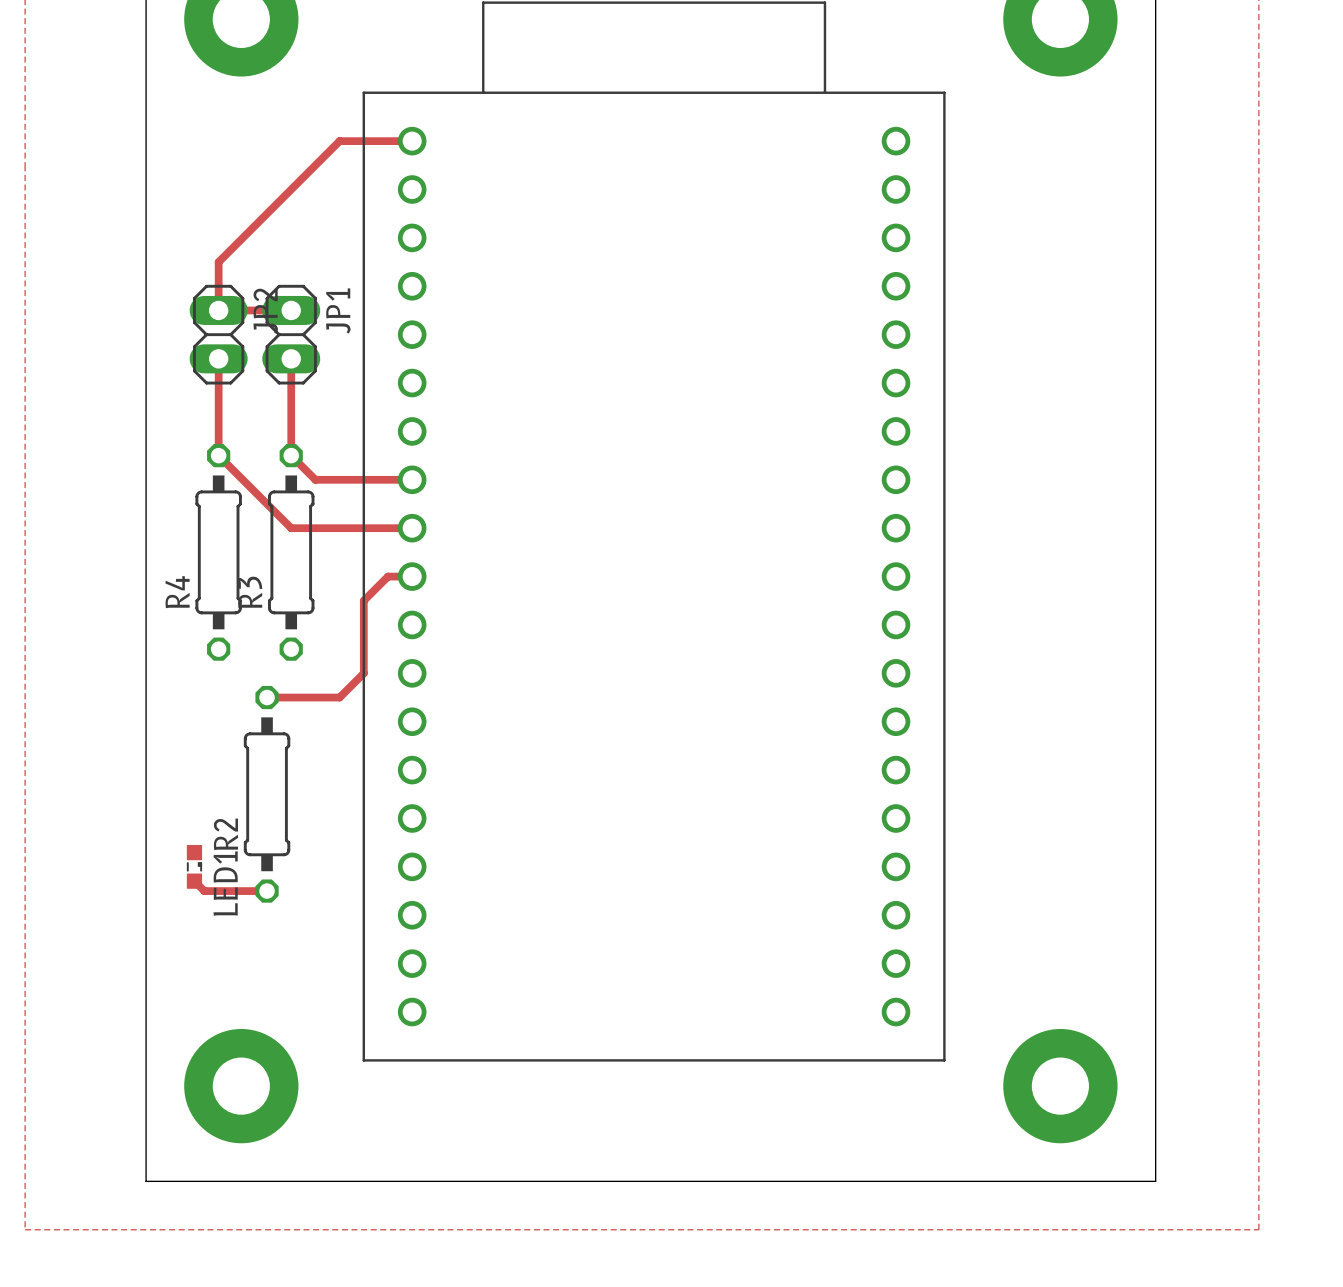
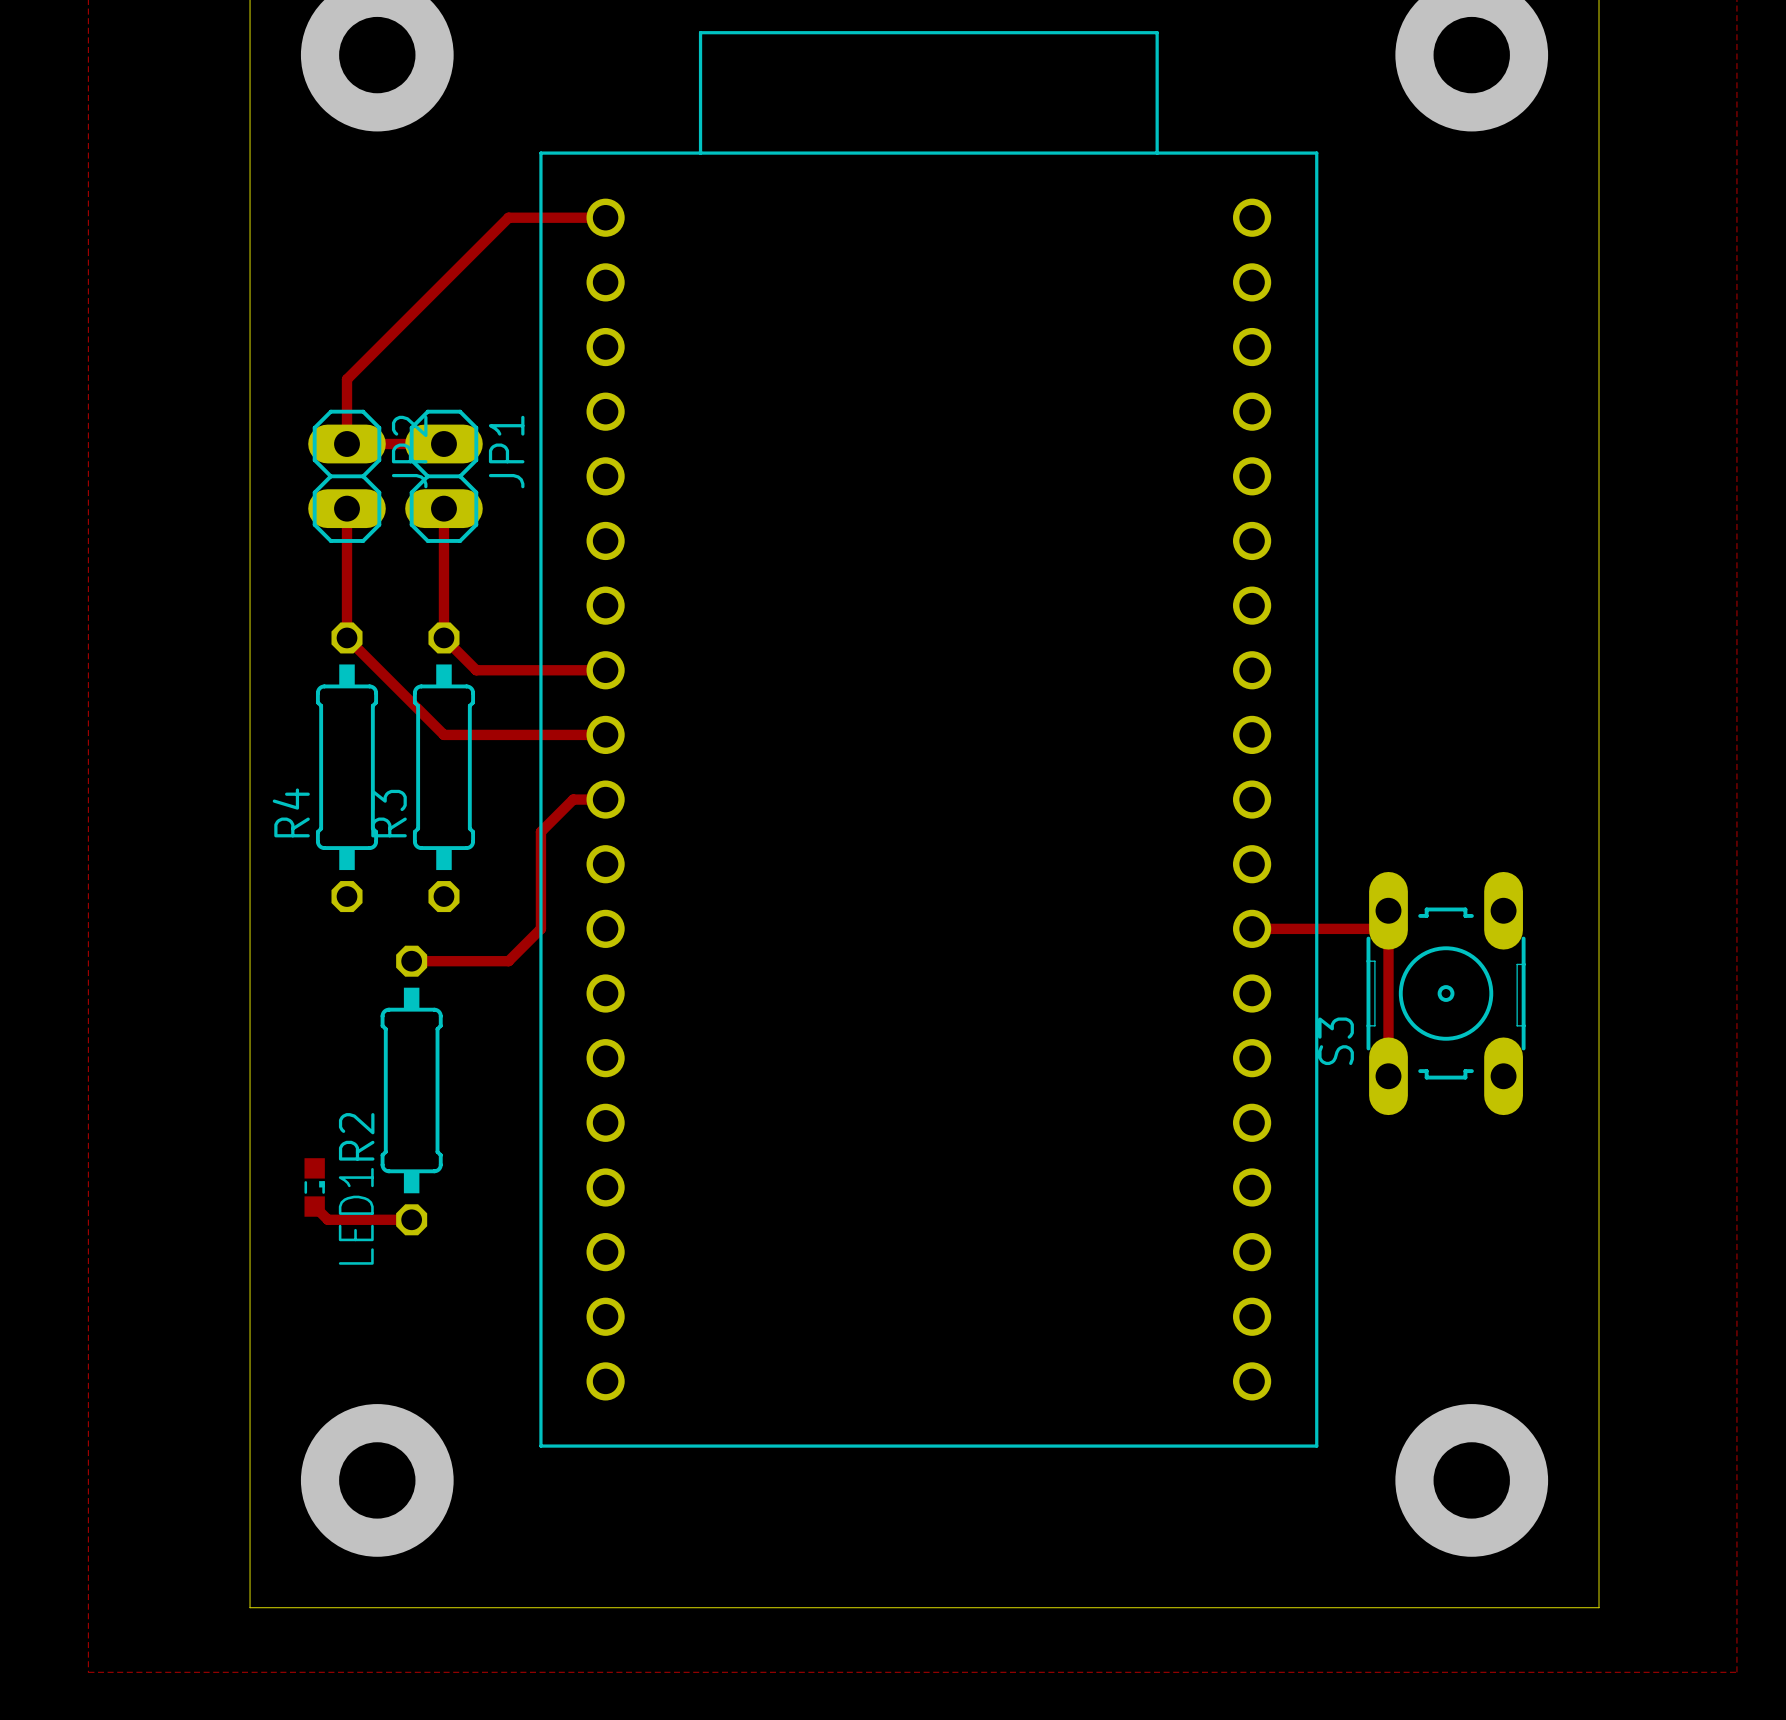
track: none -> (1388, 910) (1388, 1076)
track: none -> (1252, 928) (1388, 928)
S3: none -> (1446, 993)

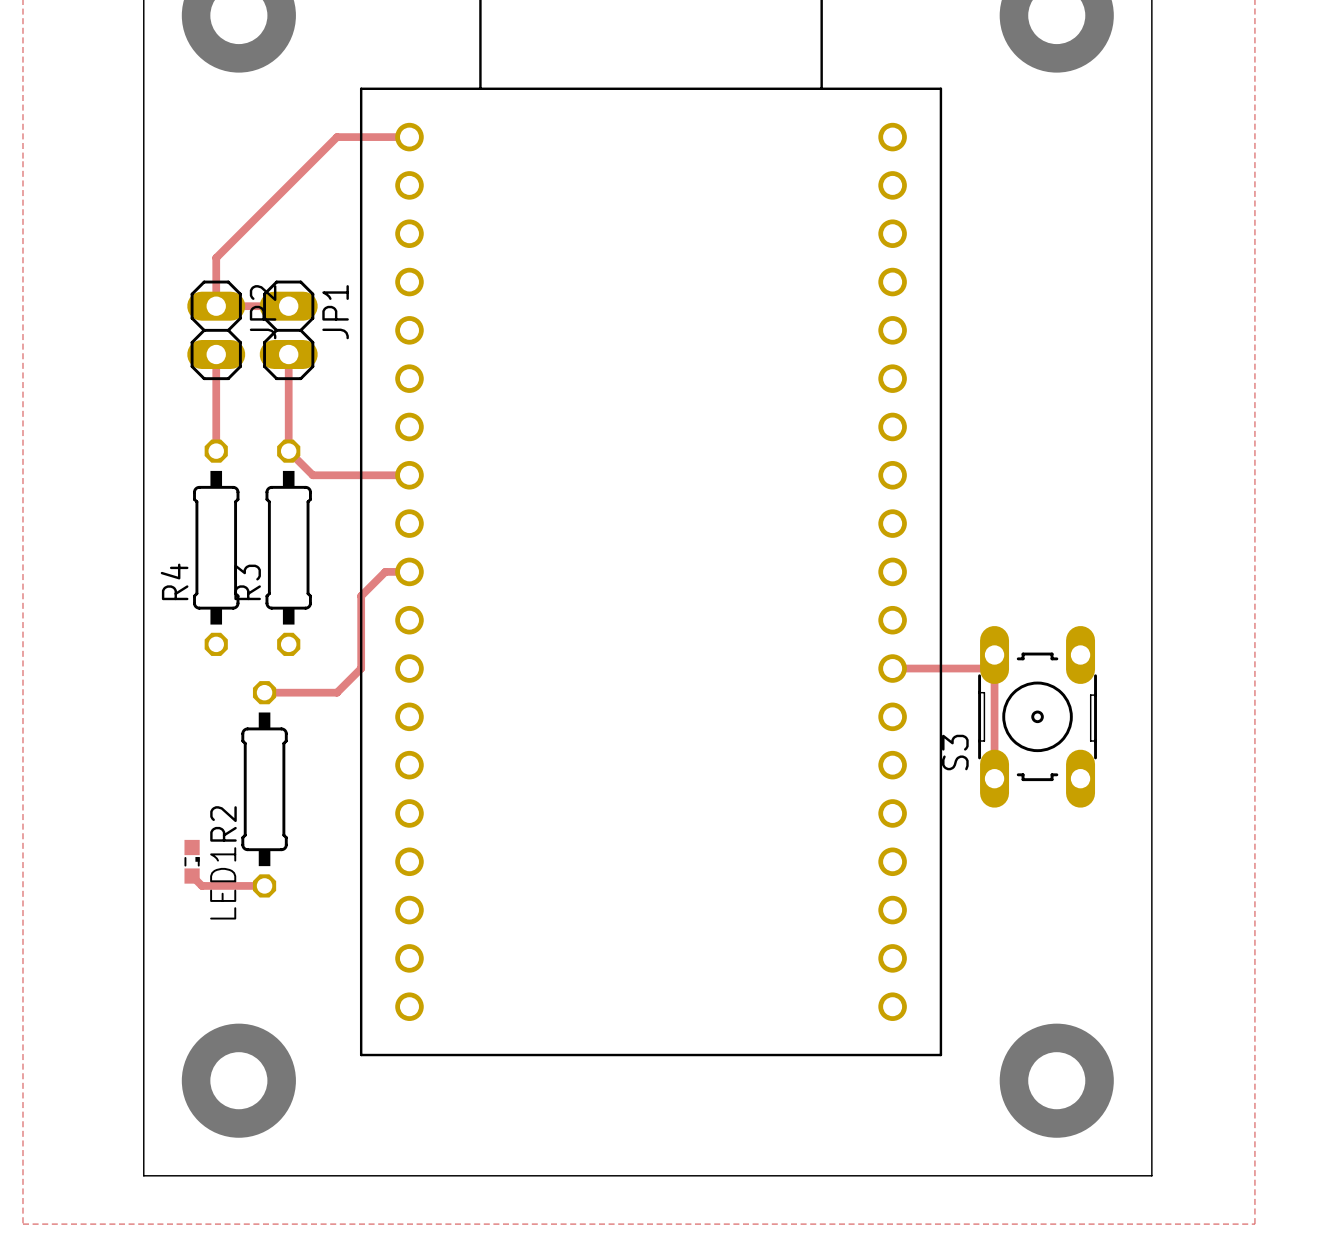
track: (347, 637) (443, 734) (605, 734) -> none

